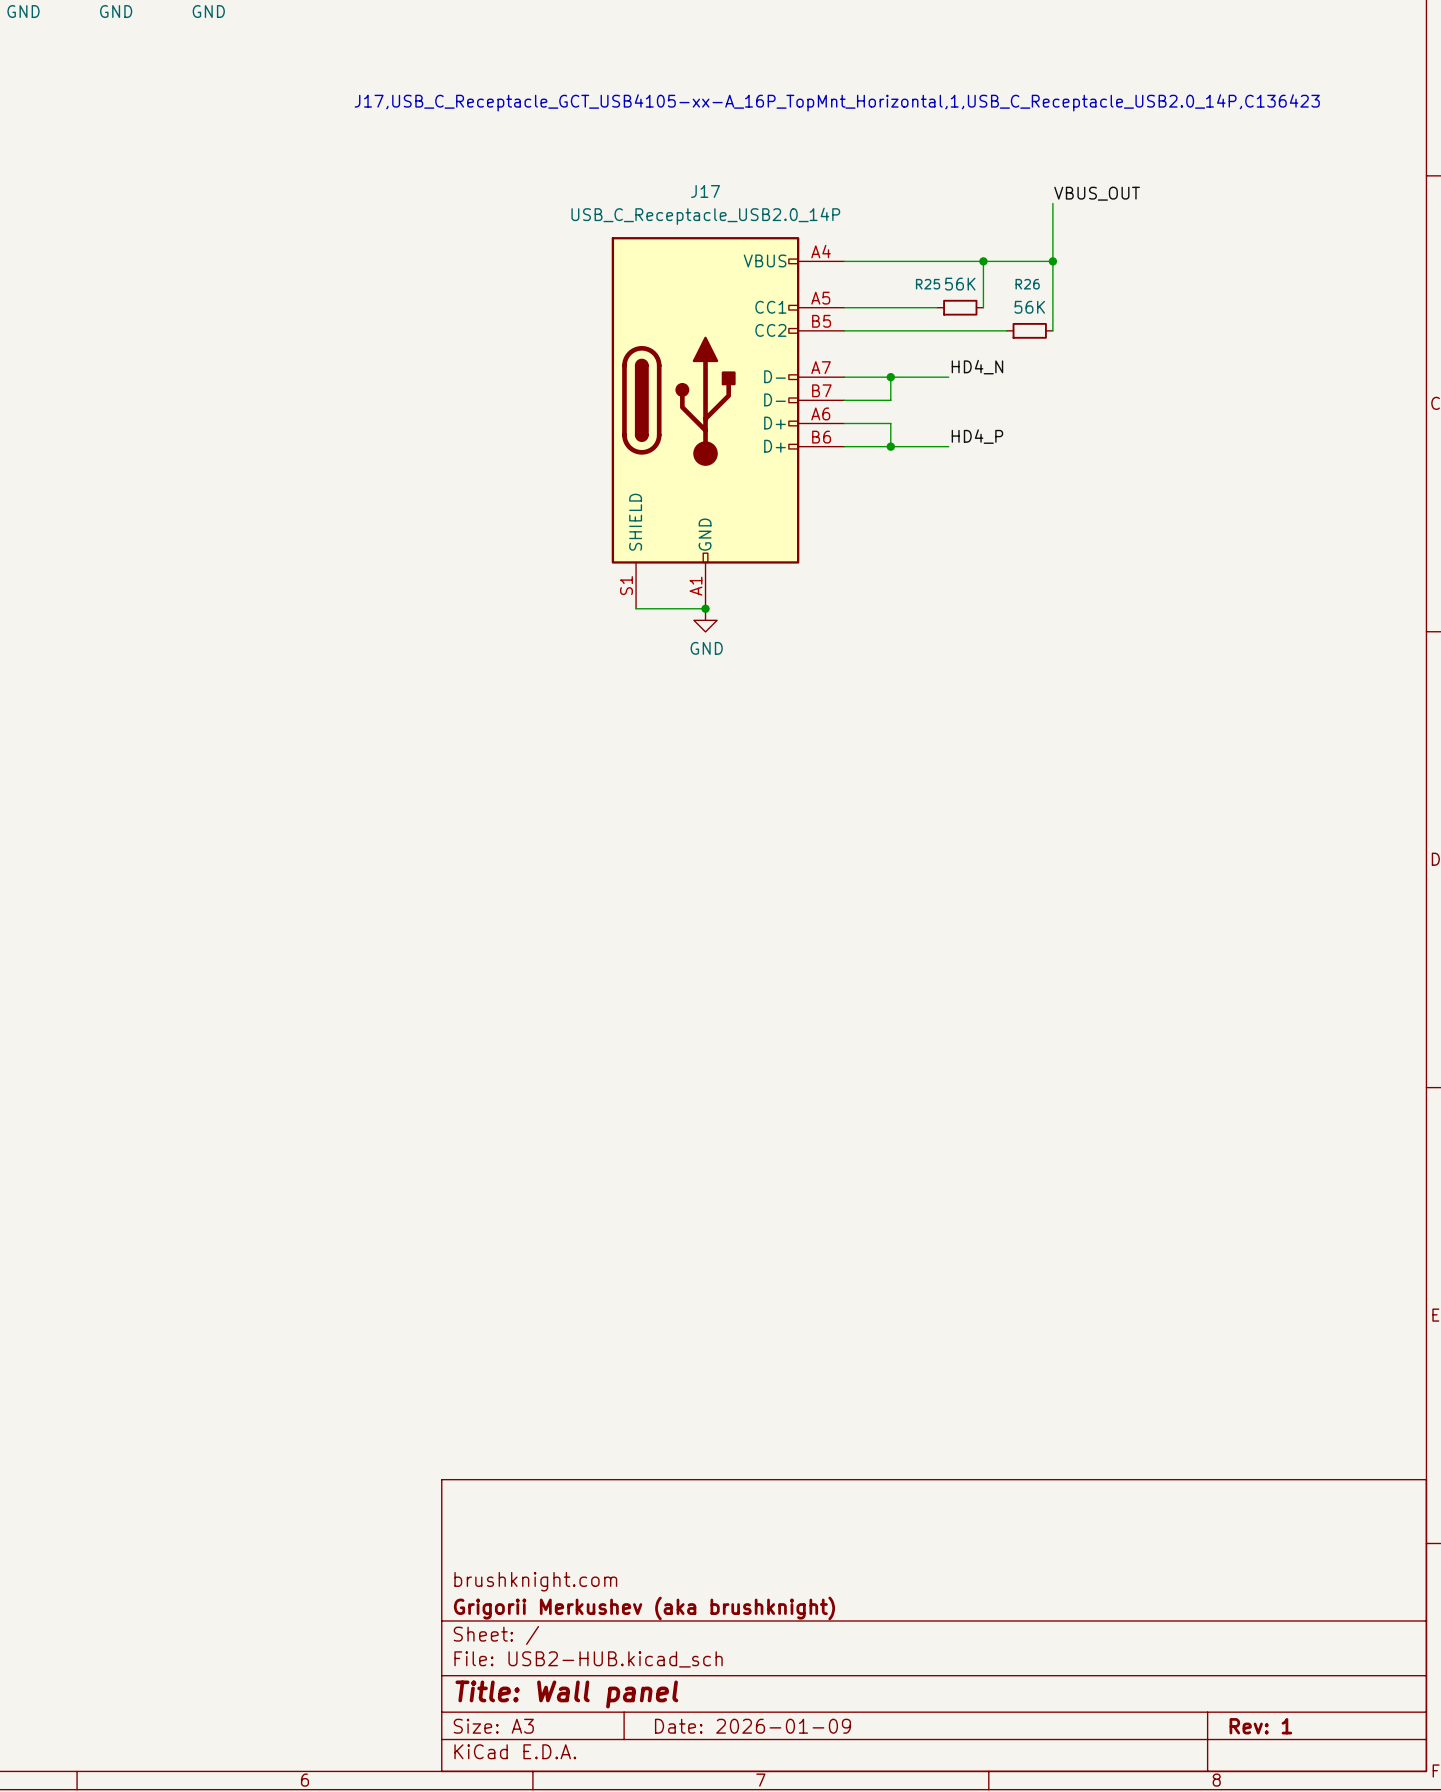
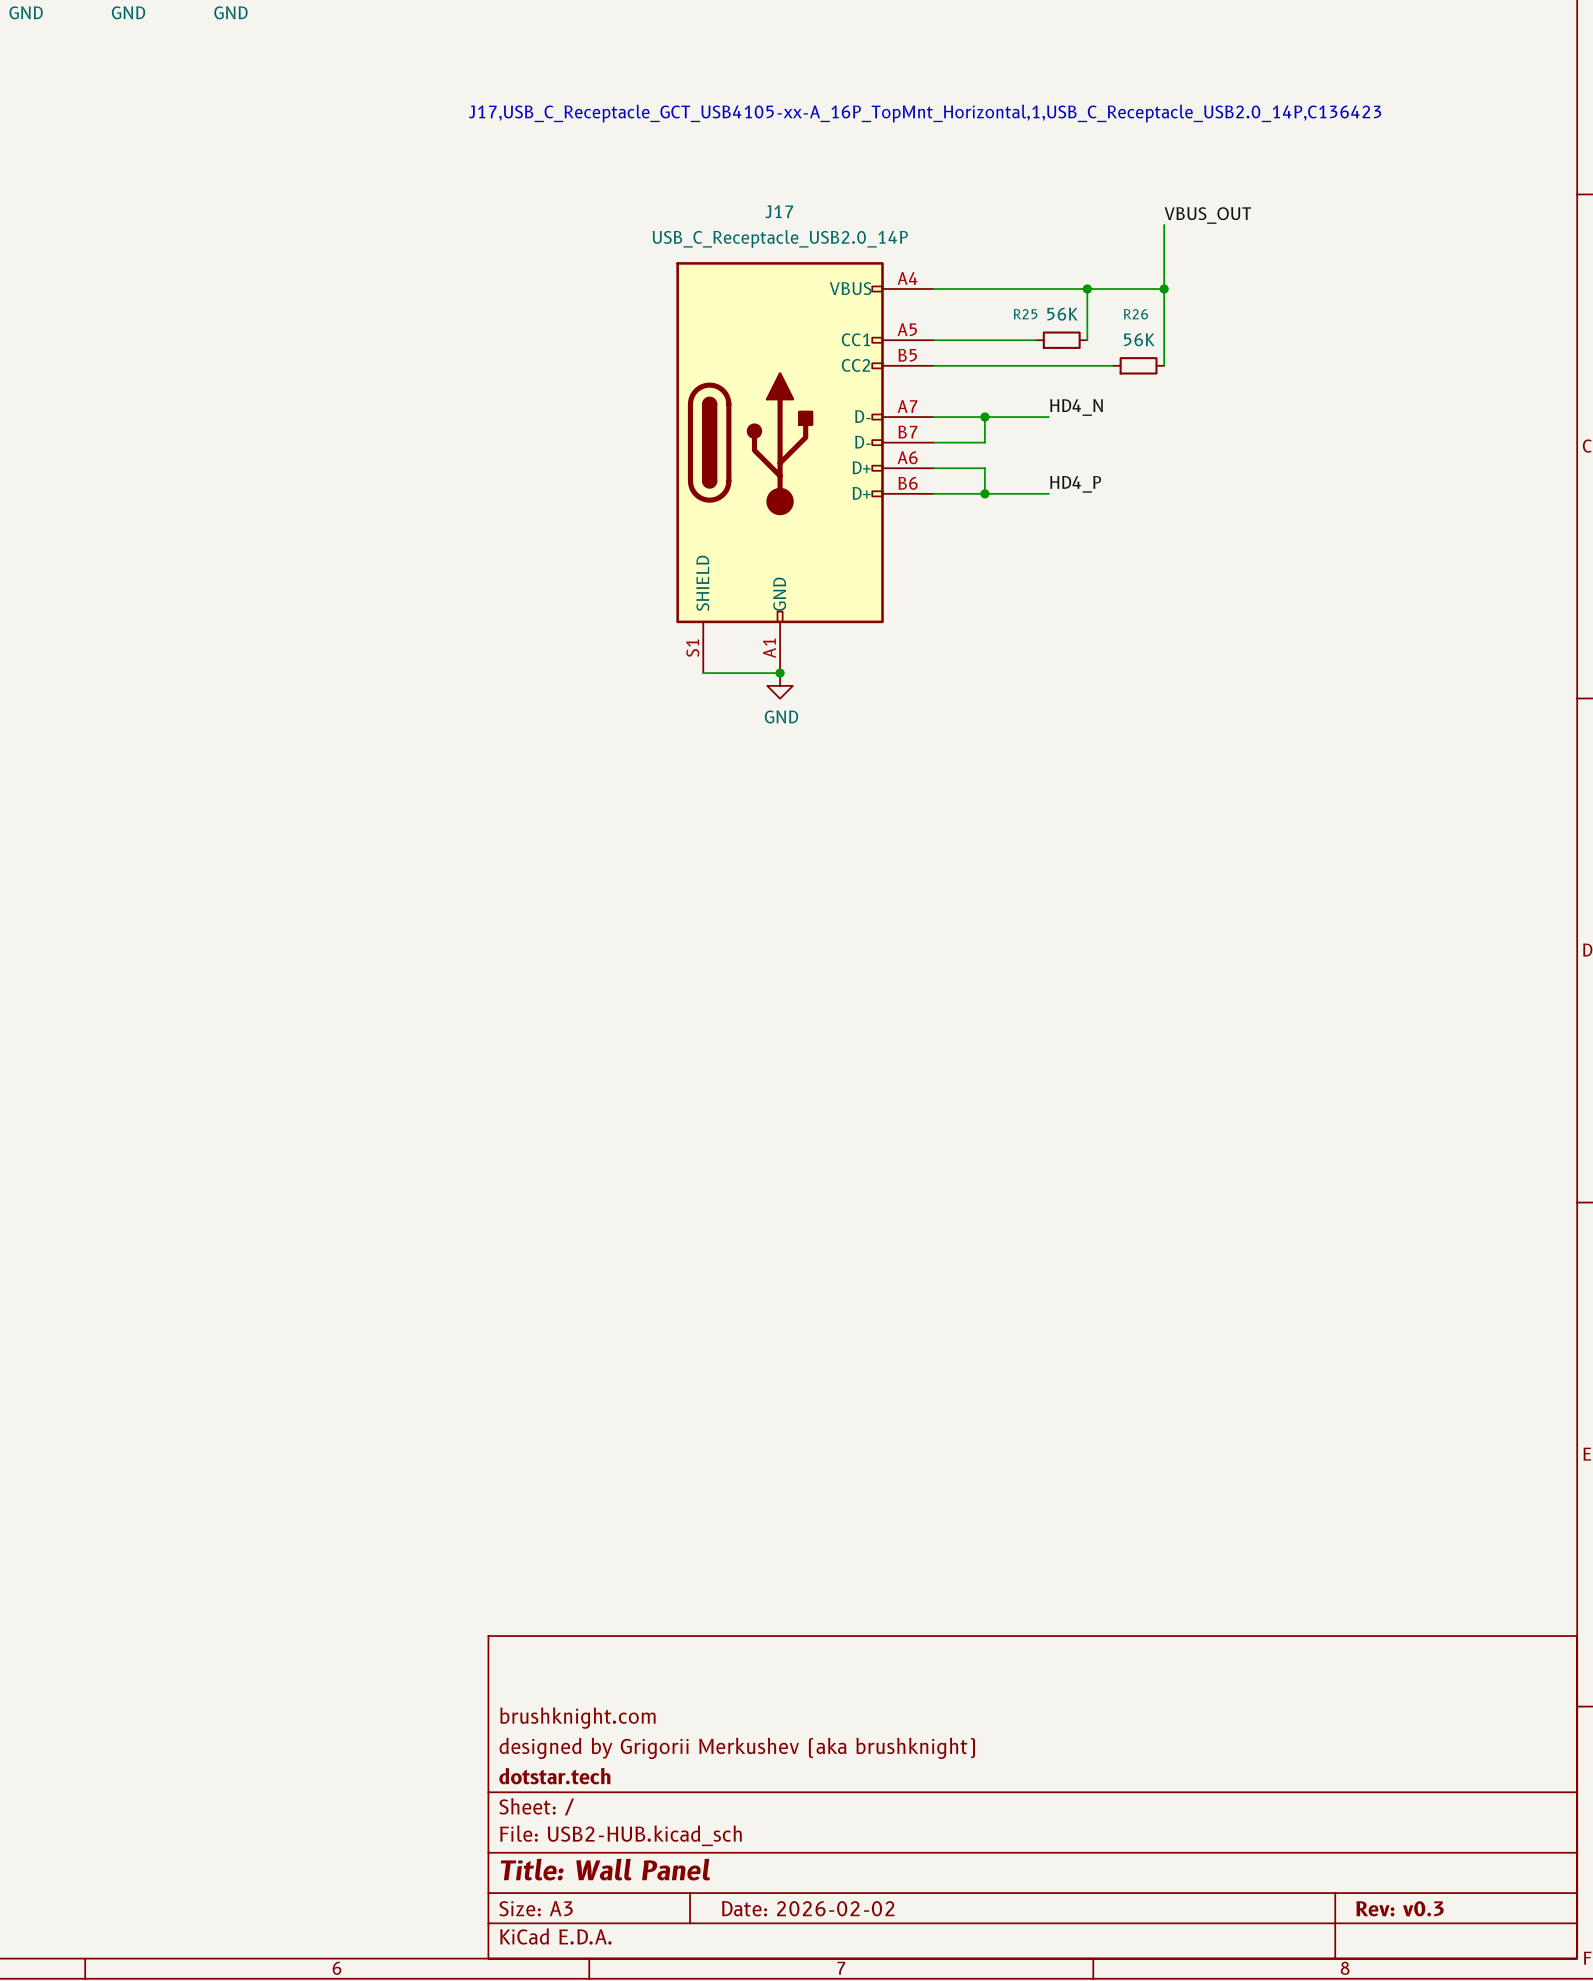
title block: none -> brushknight.com (577, 1718)
title block: brushknight.com (535, 1581) -> designed by Grigorii Merkushev (aka brushknight) (737, 1748)
title block: Grigorii Merkushev (aka brushknight) (644, 1608) -> dotstar.tech (554, 1776)
title block: Title: Wall panel (566, 1694) -> Title: Wall Panel (605, 1869)
title block: Date: 2026-01-09 (752, 1726) -> Date: 2026-02-02 (808, 1908)
title block: Rev: 1 (1260, 1726) -> Rev: v0.3 (1399, 1908)

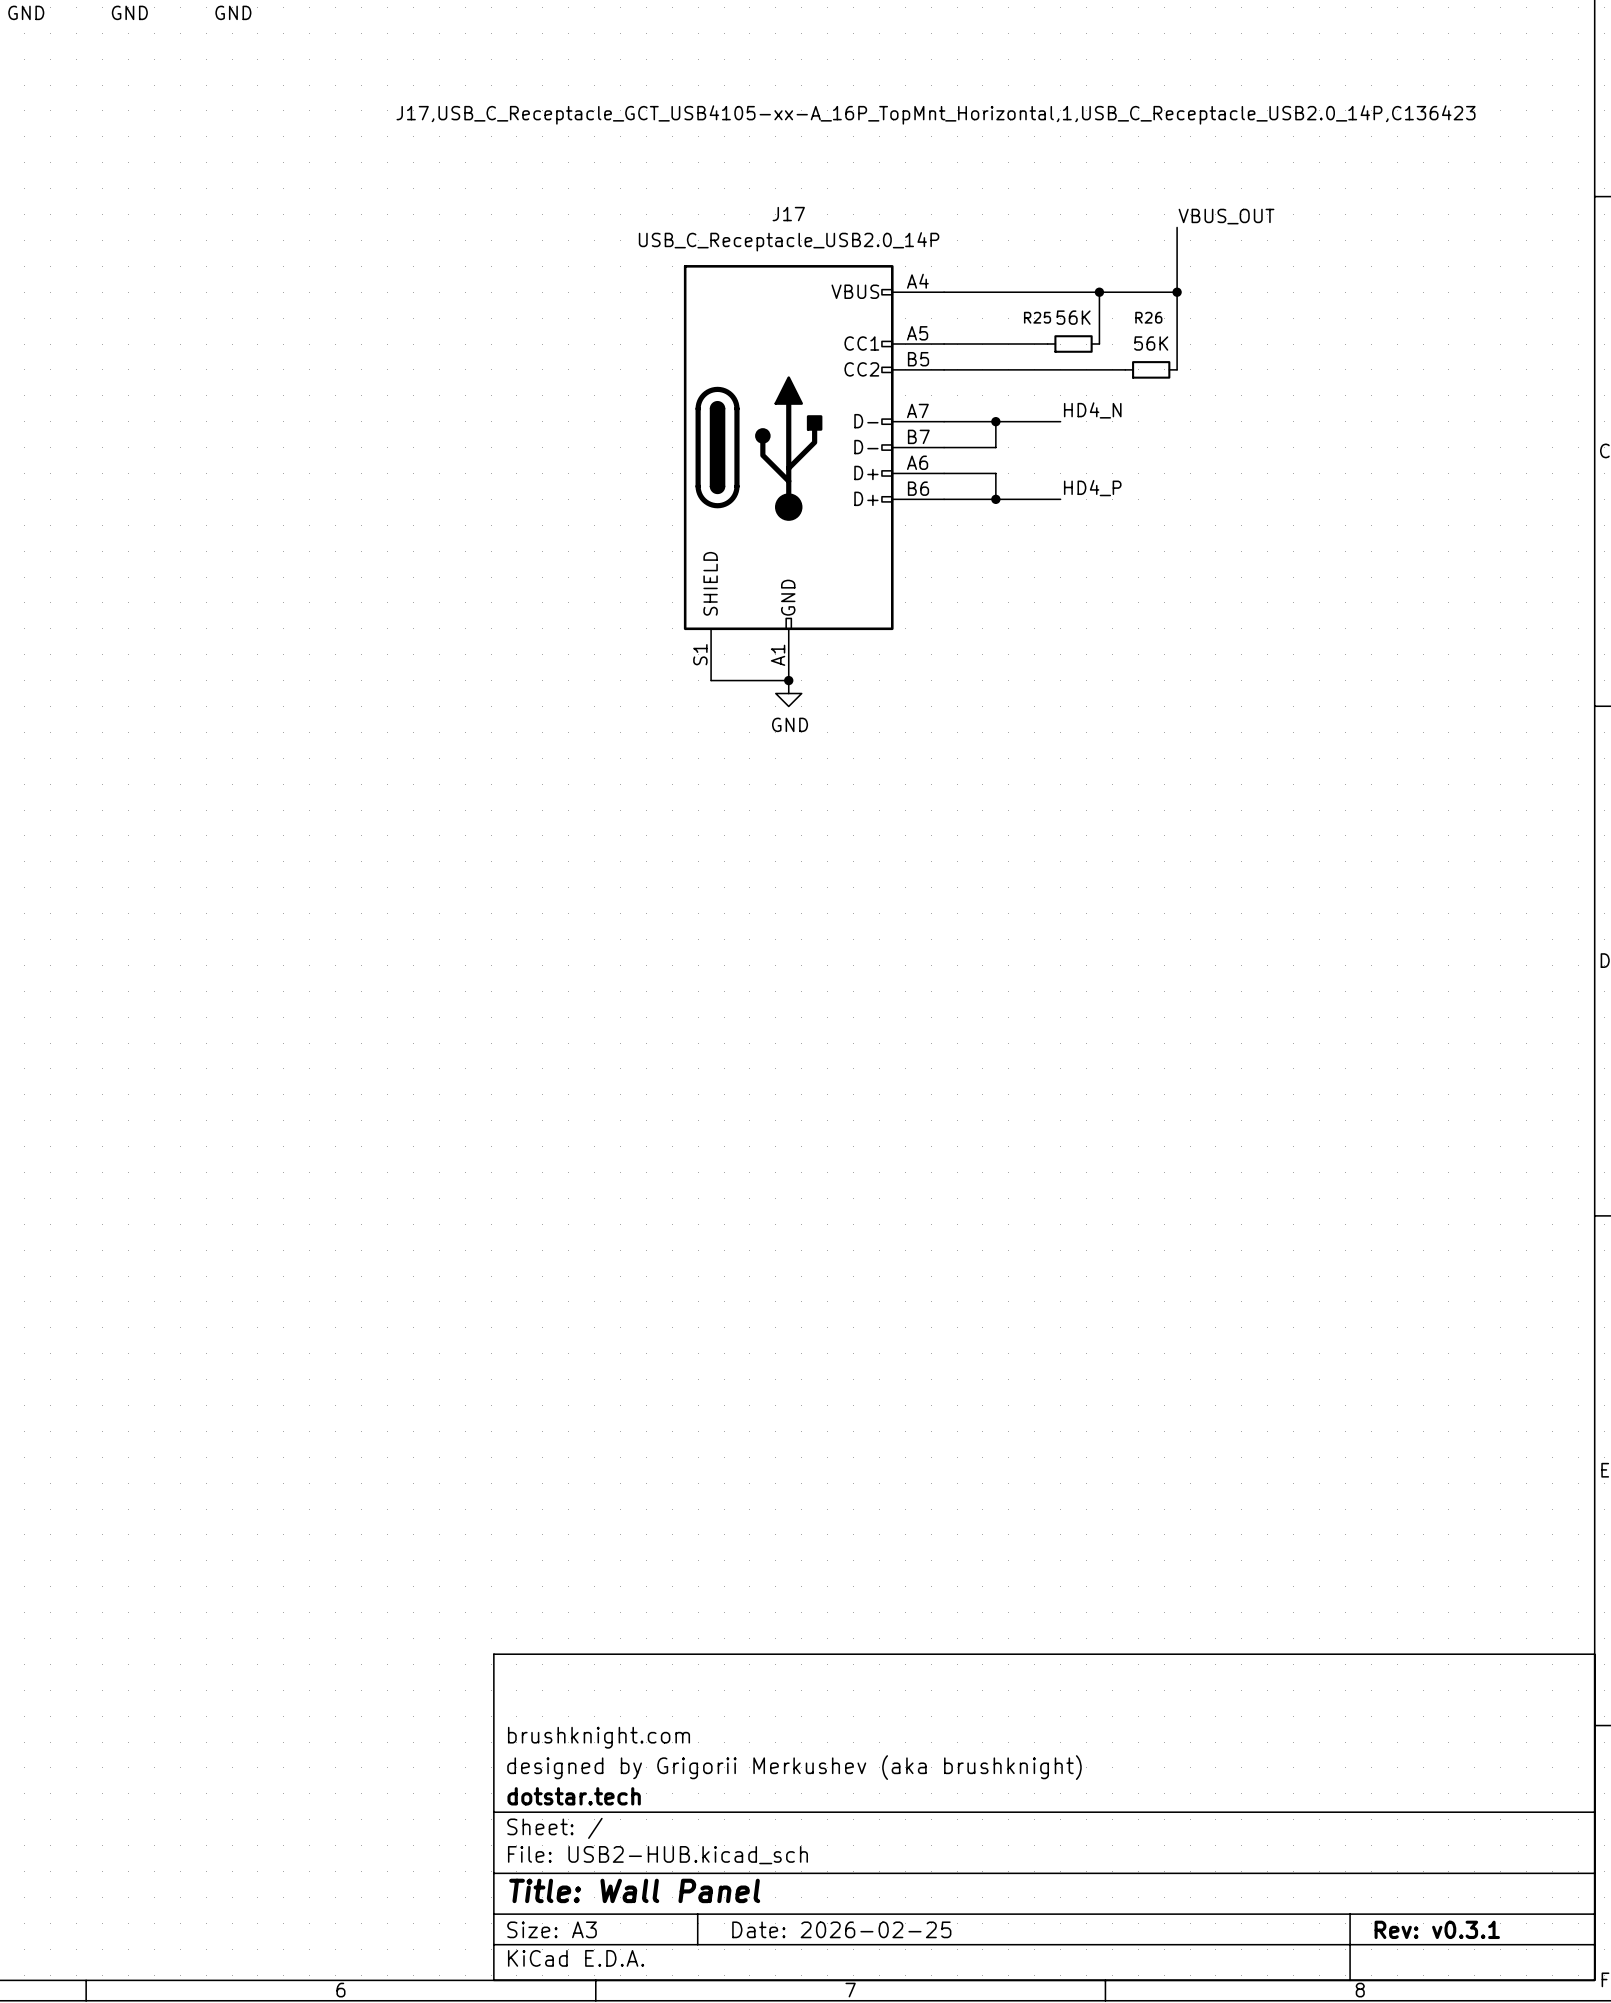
title block: Date: 2026-02-02 (808, 1908) -> Date: 2026-02-25 (841, 1929)
title block: Rev: v0.3 (1399, 1908) -> Rev: v0.3.1 (1437, 1929)

